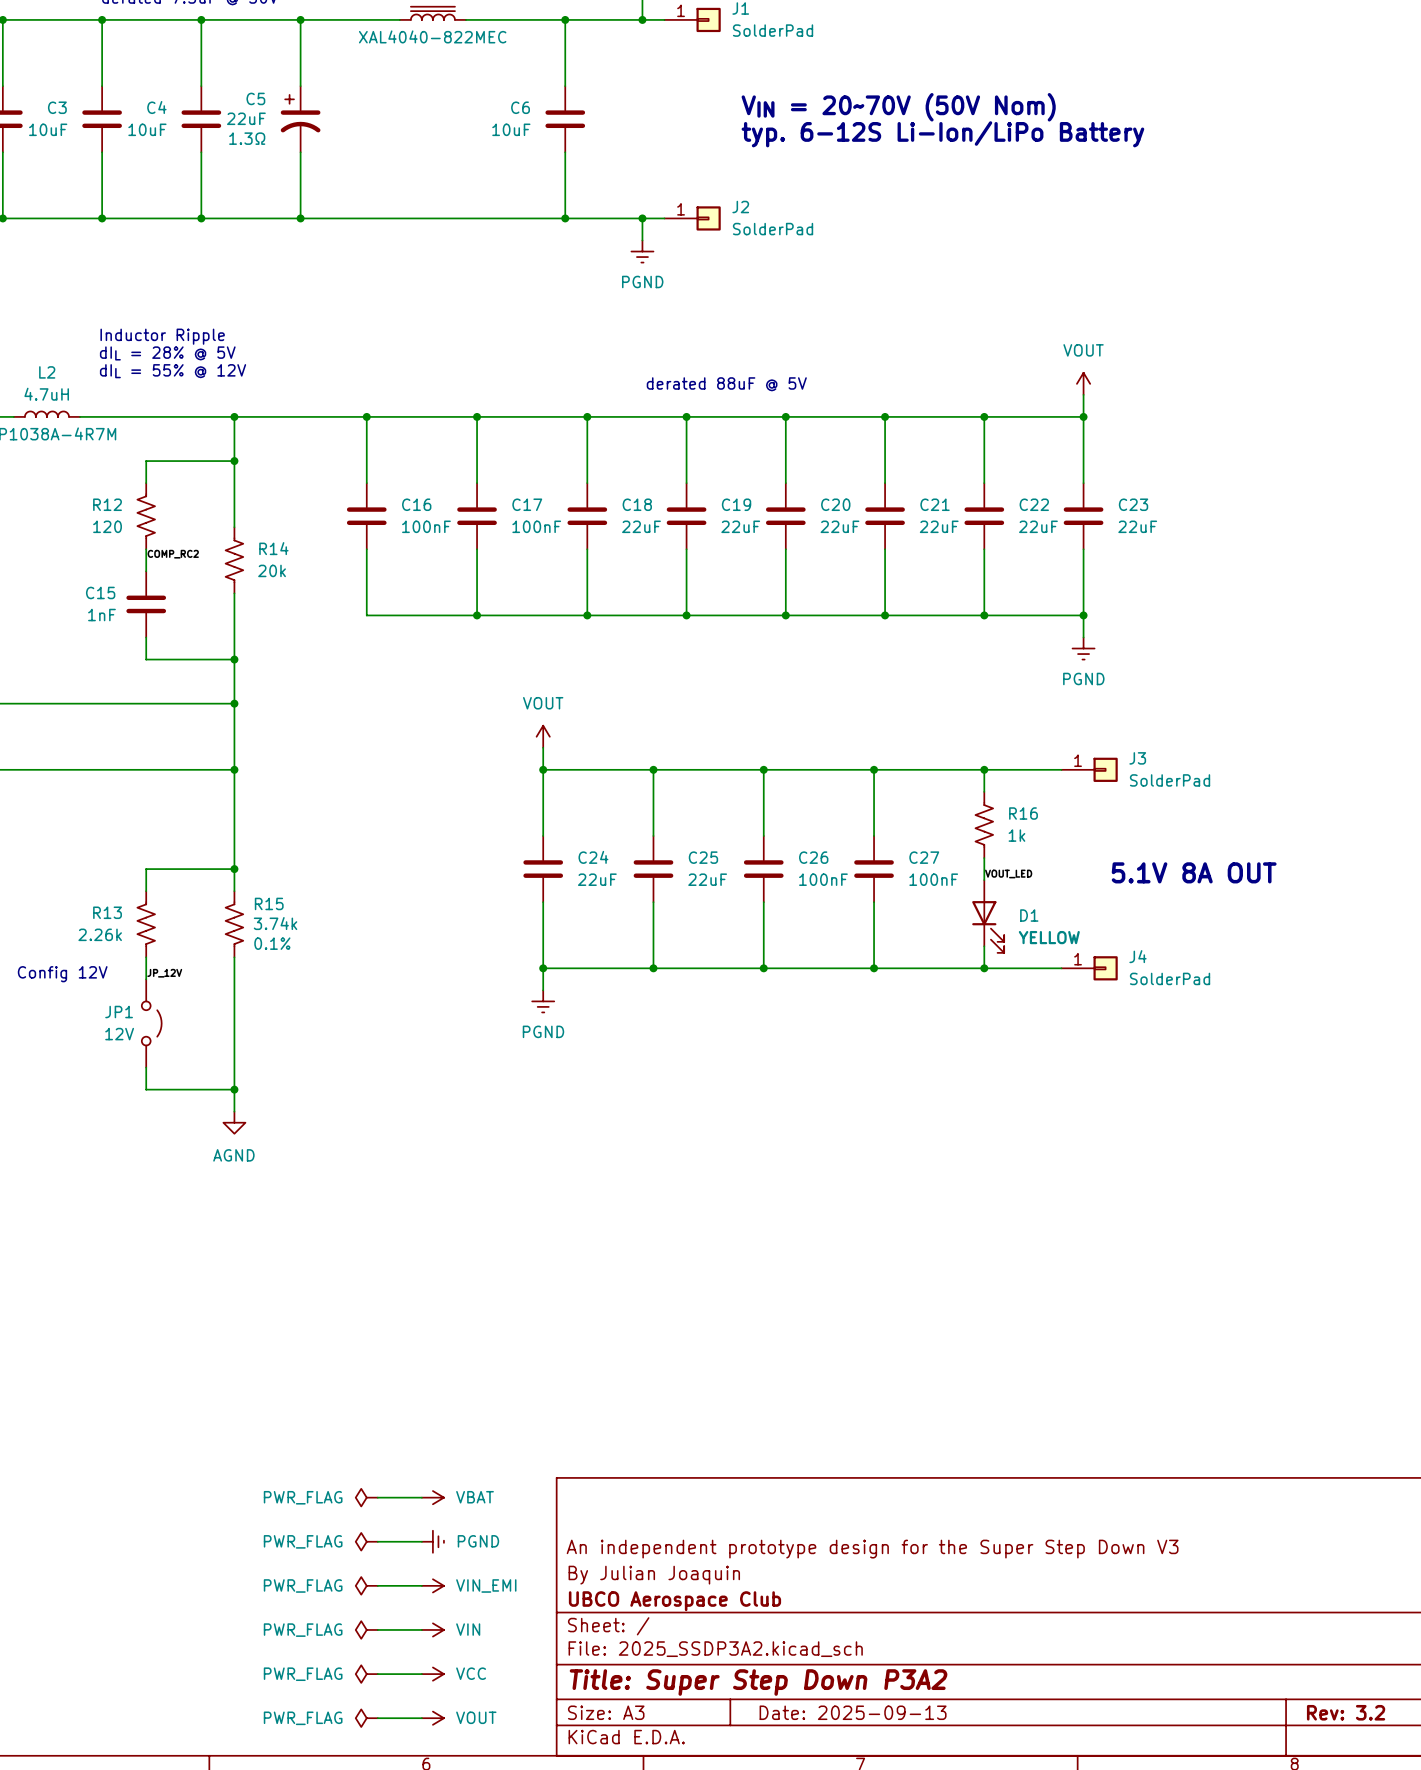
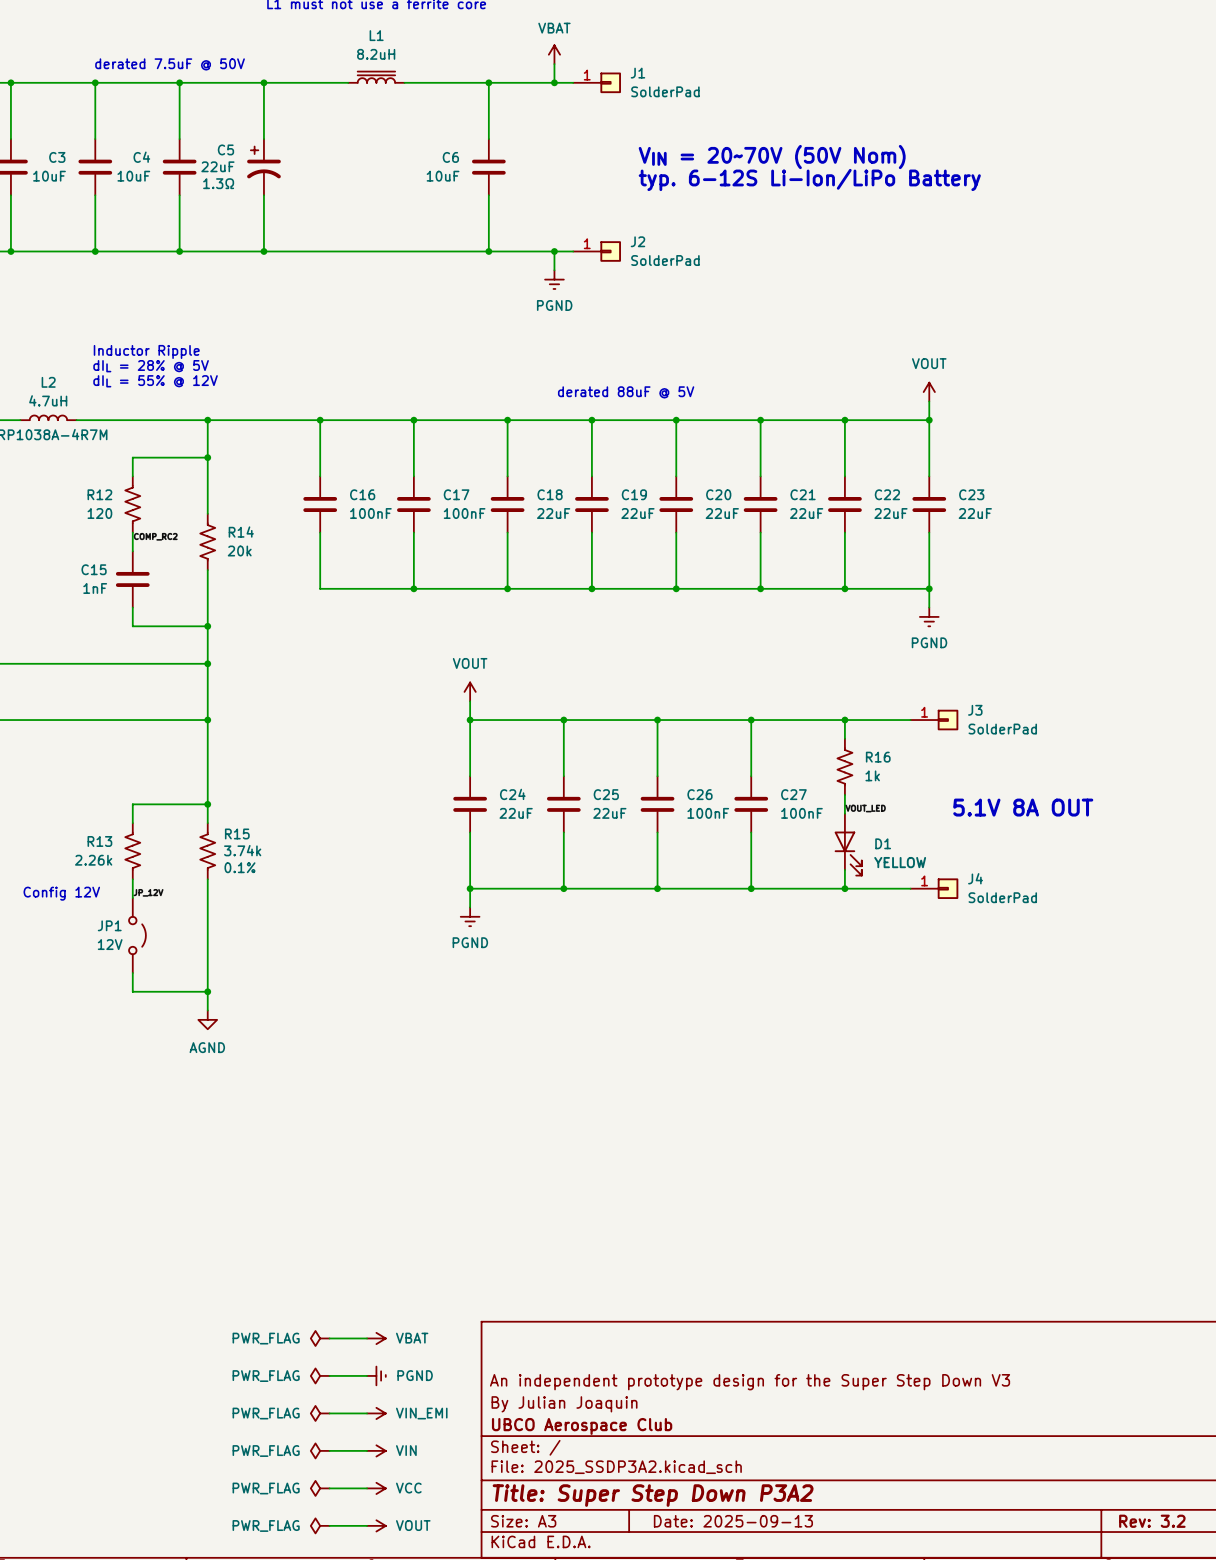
L1 text: XAL4040-822MEC (432, 36) -> none

